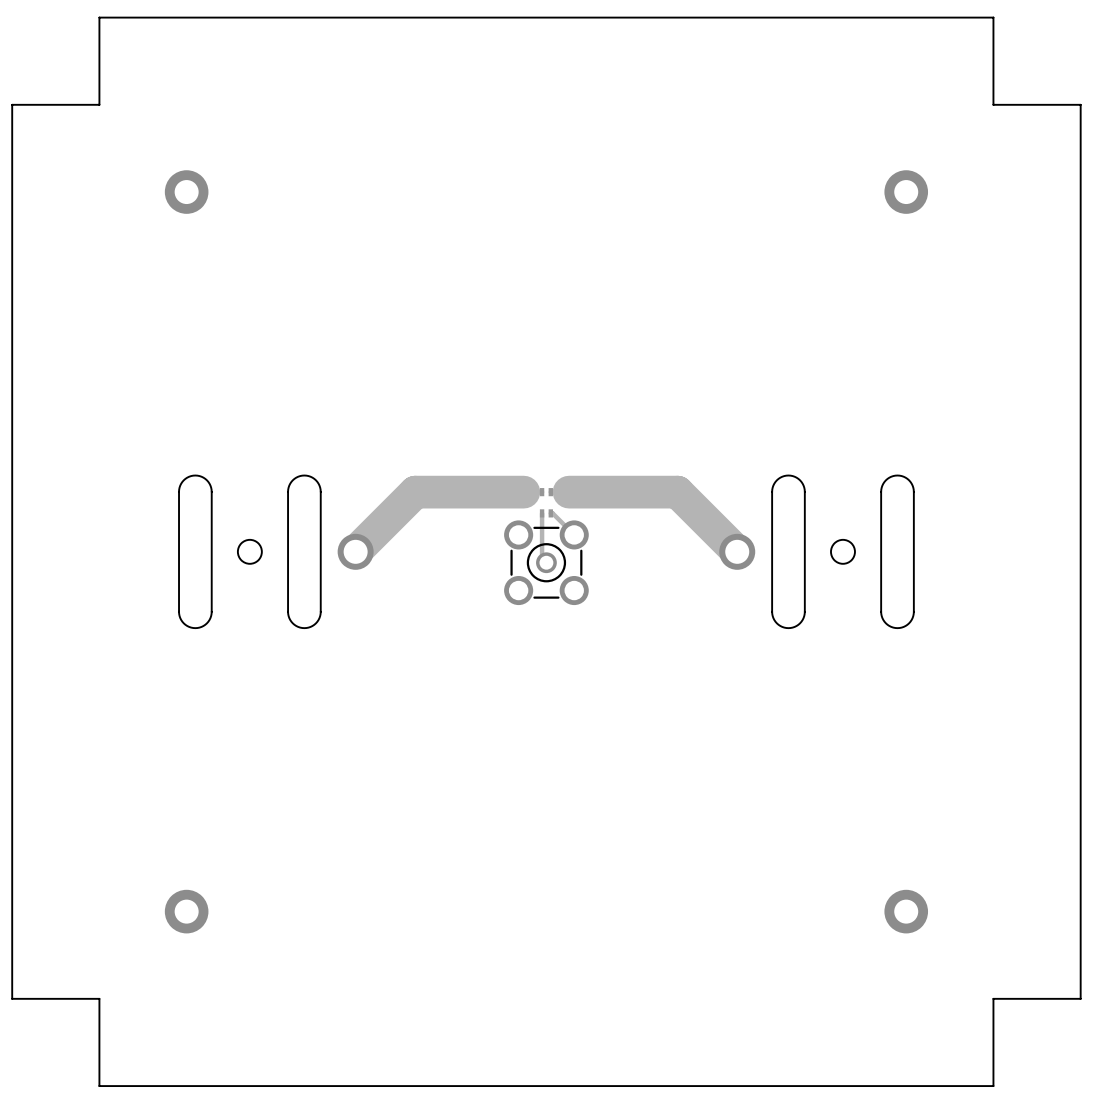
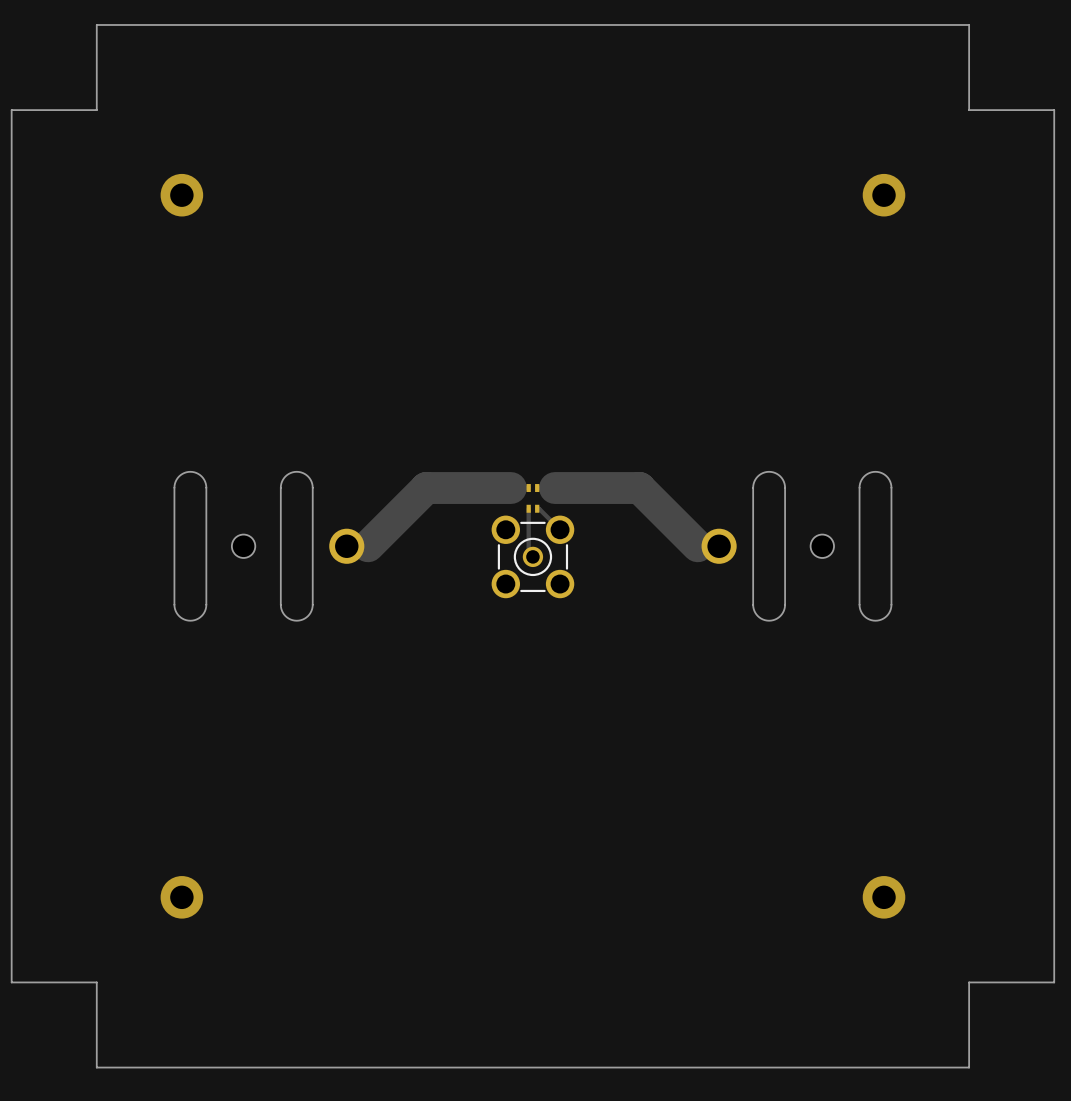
track: (437, 492) (415, 492) (355, 551) -> (426, 488) (368, 546)
track: (655, 492) (677, 492) (737, 551) -> (639, 488) (697, 546)

